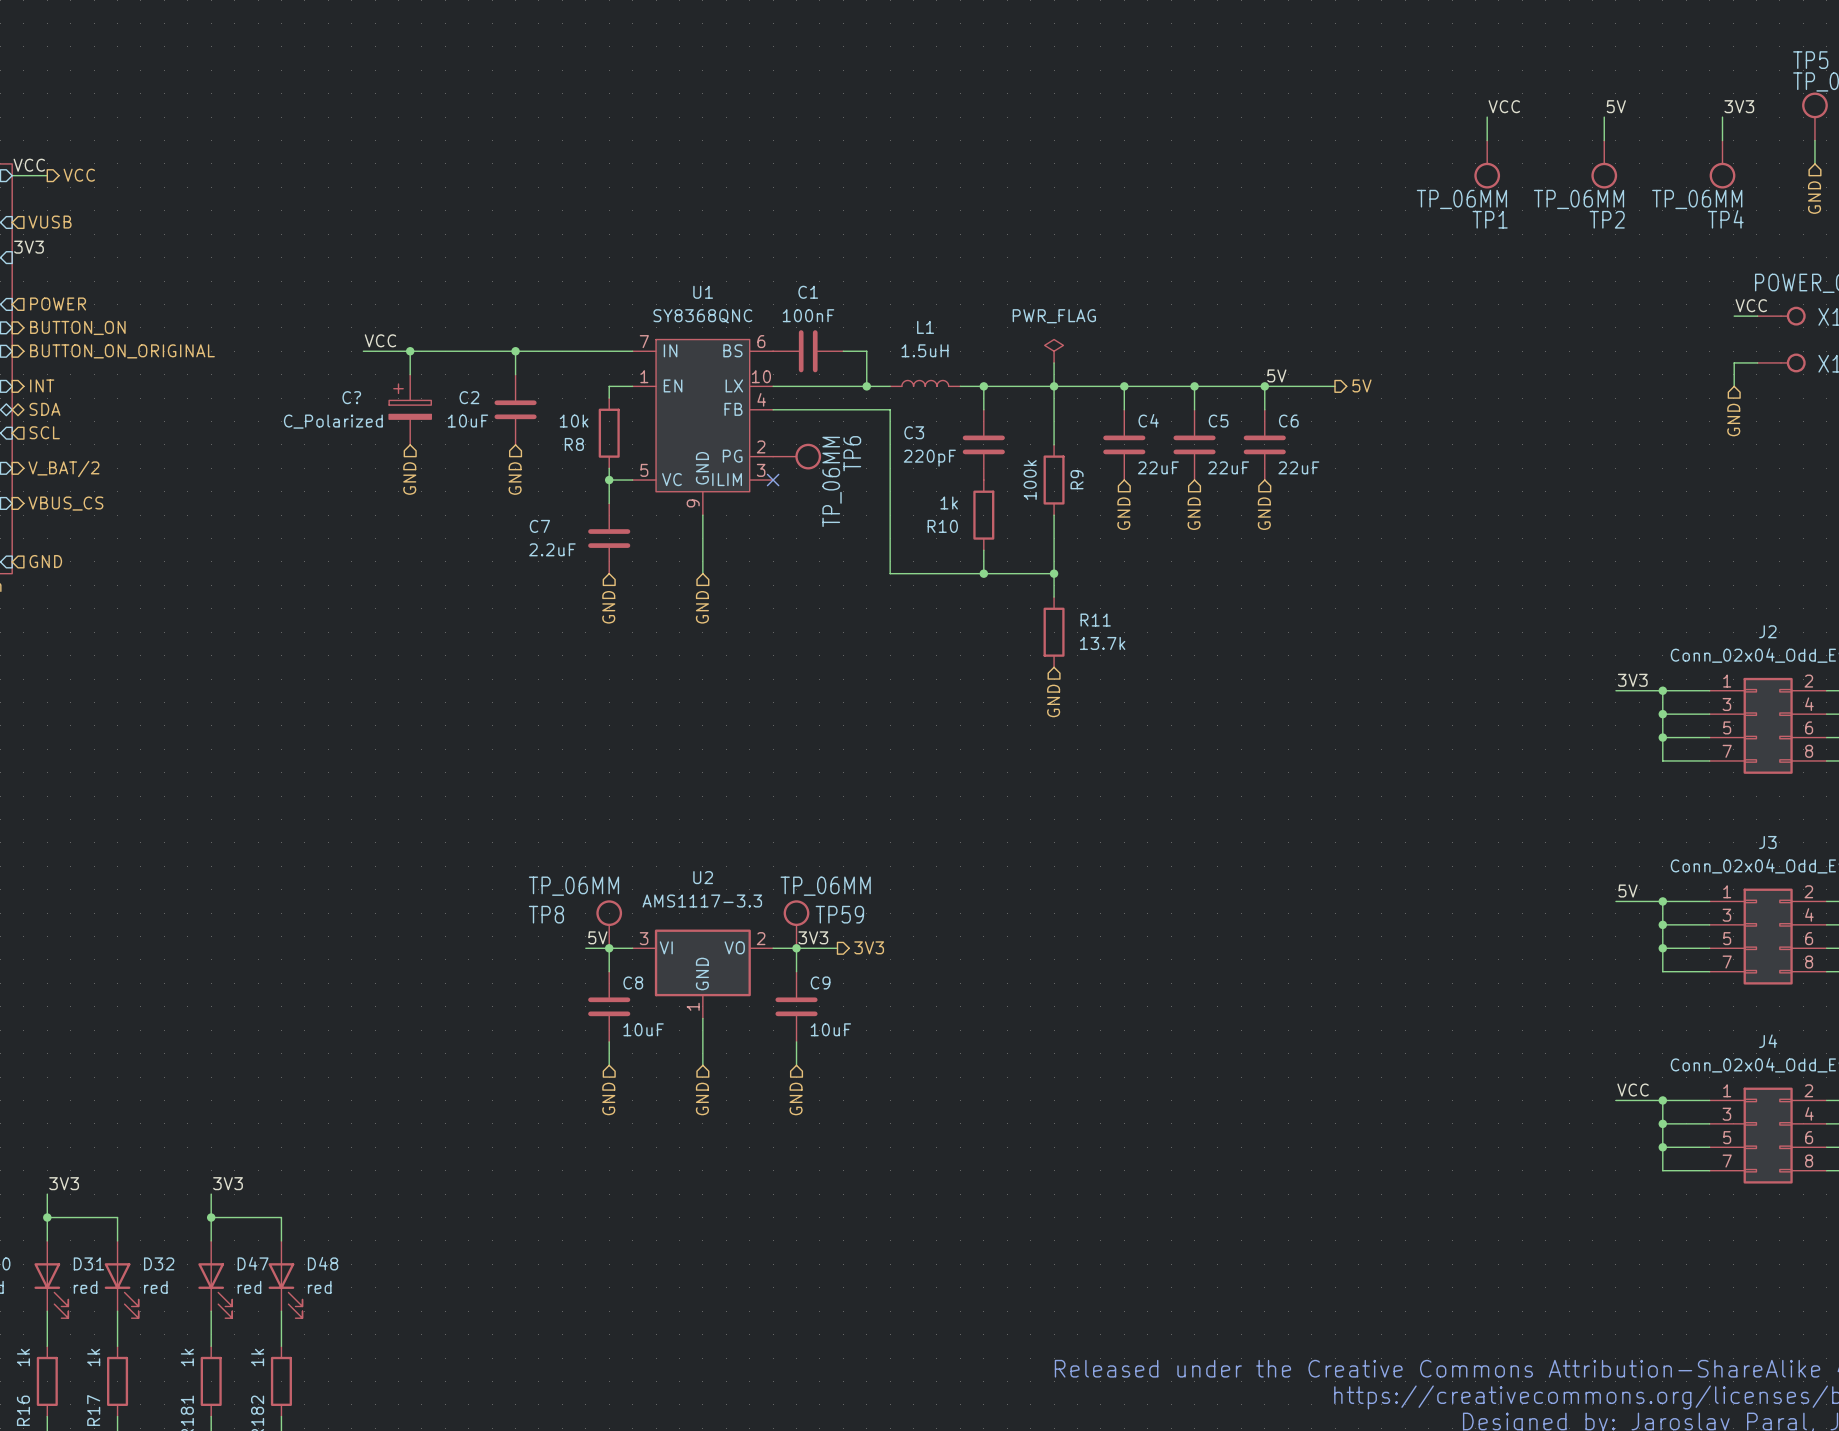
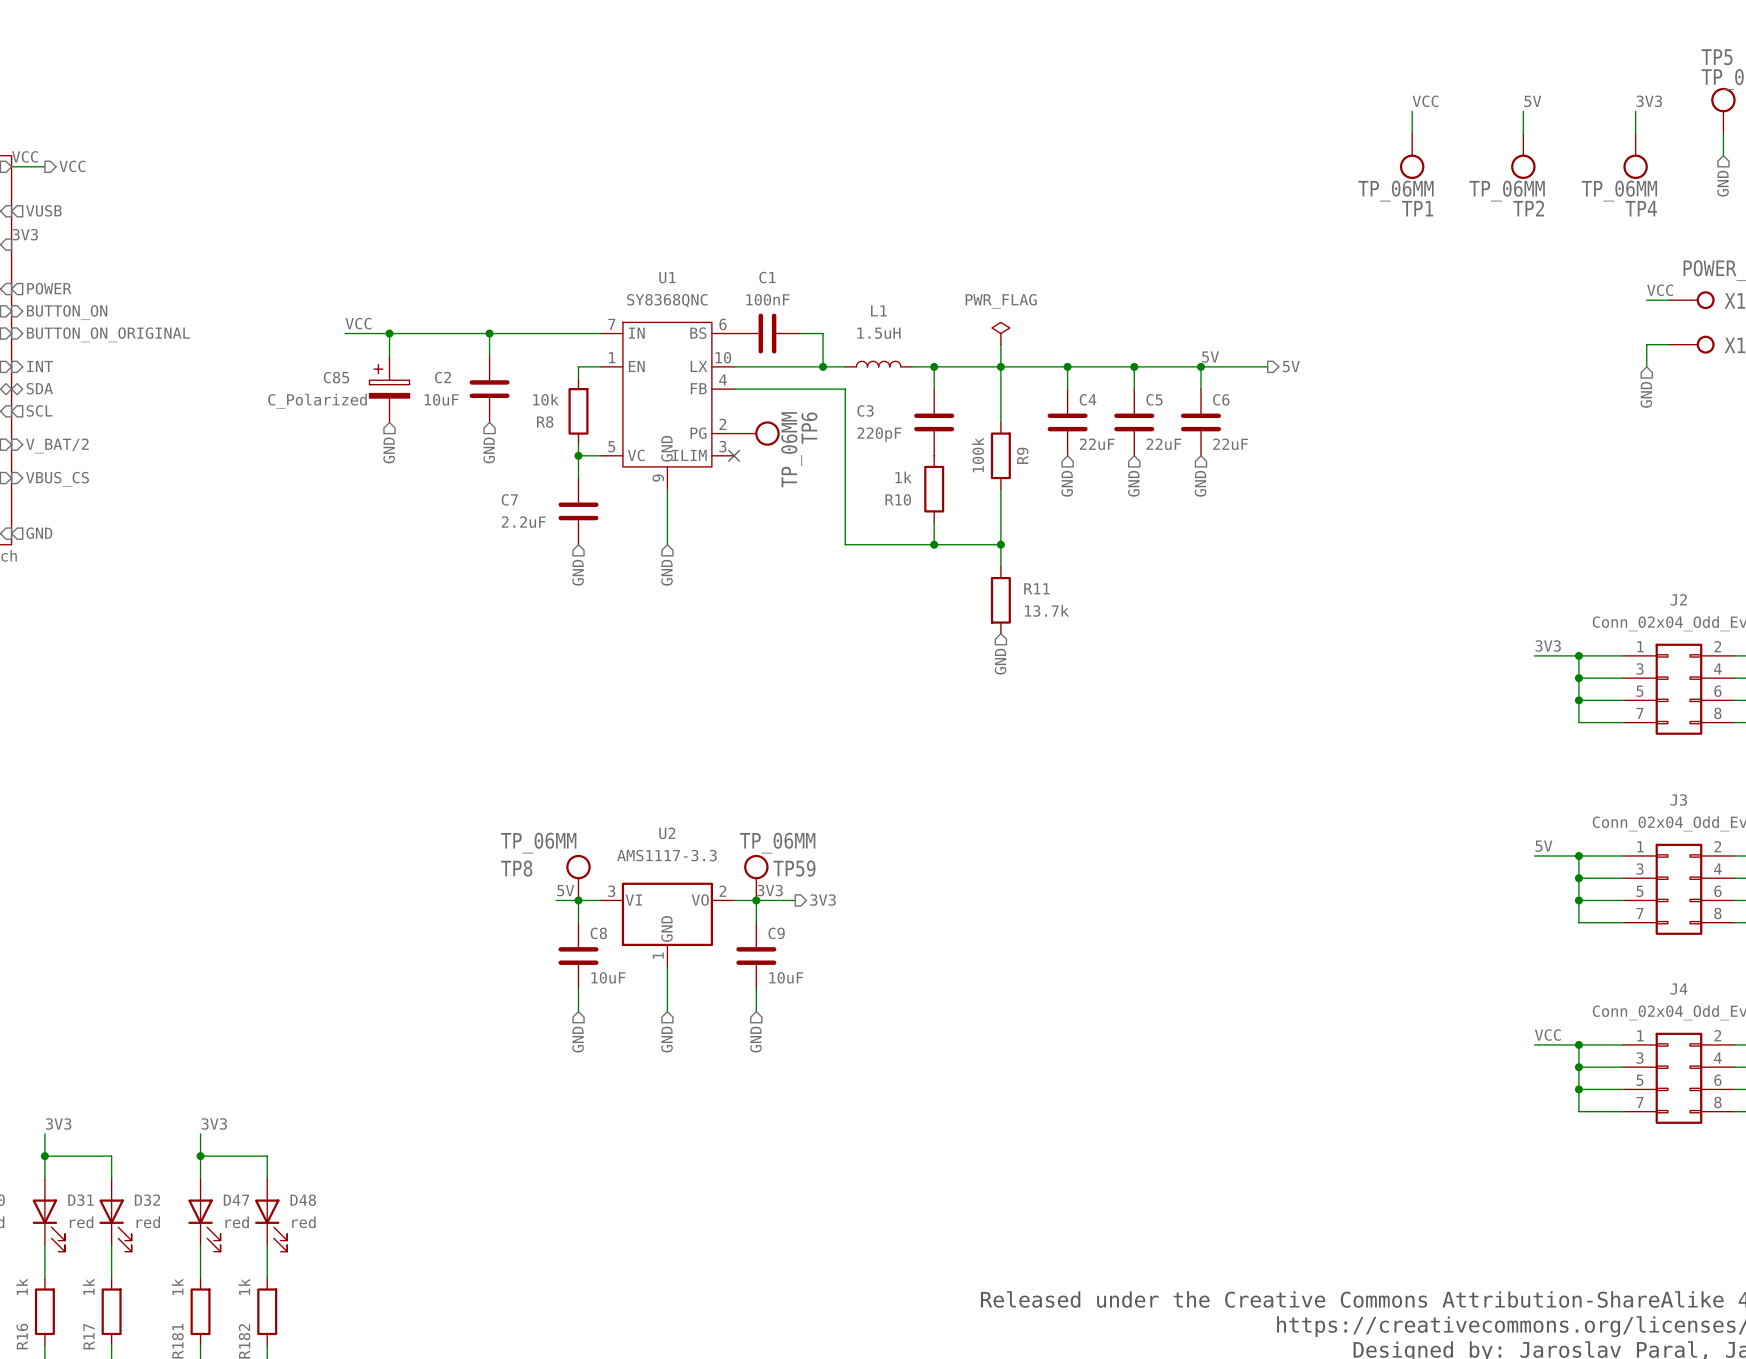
C? name: C? (351, 397) -> C85 (336, 377)

